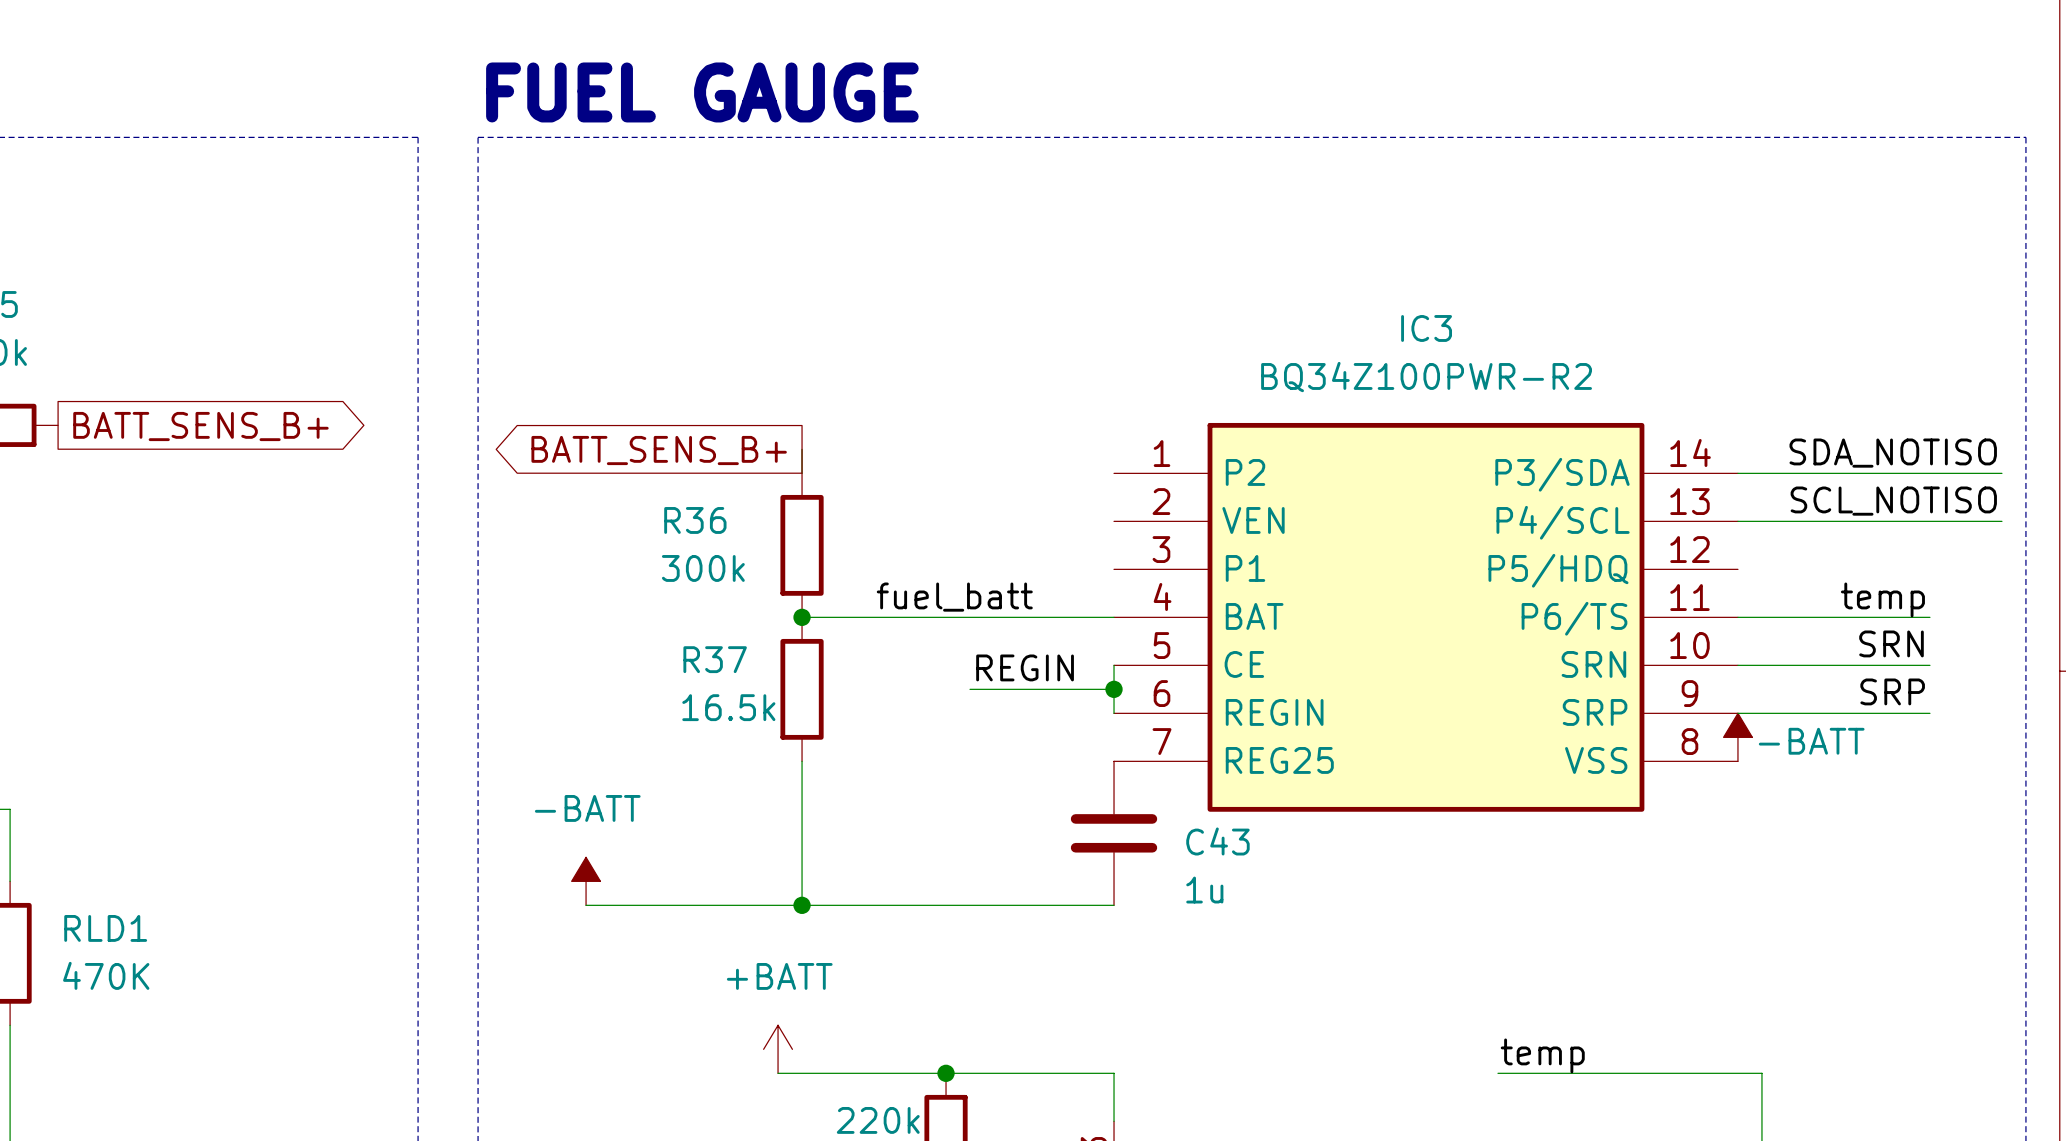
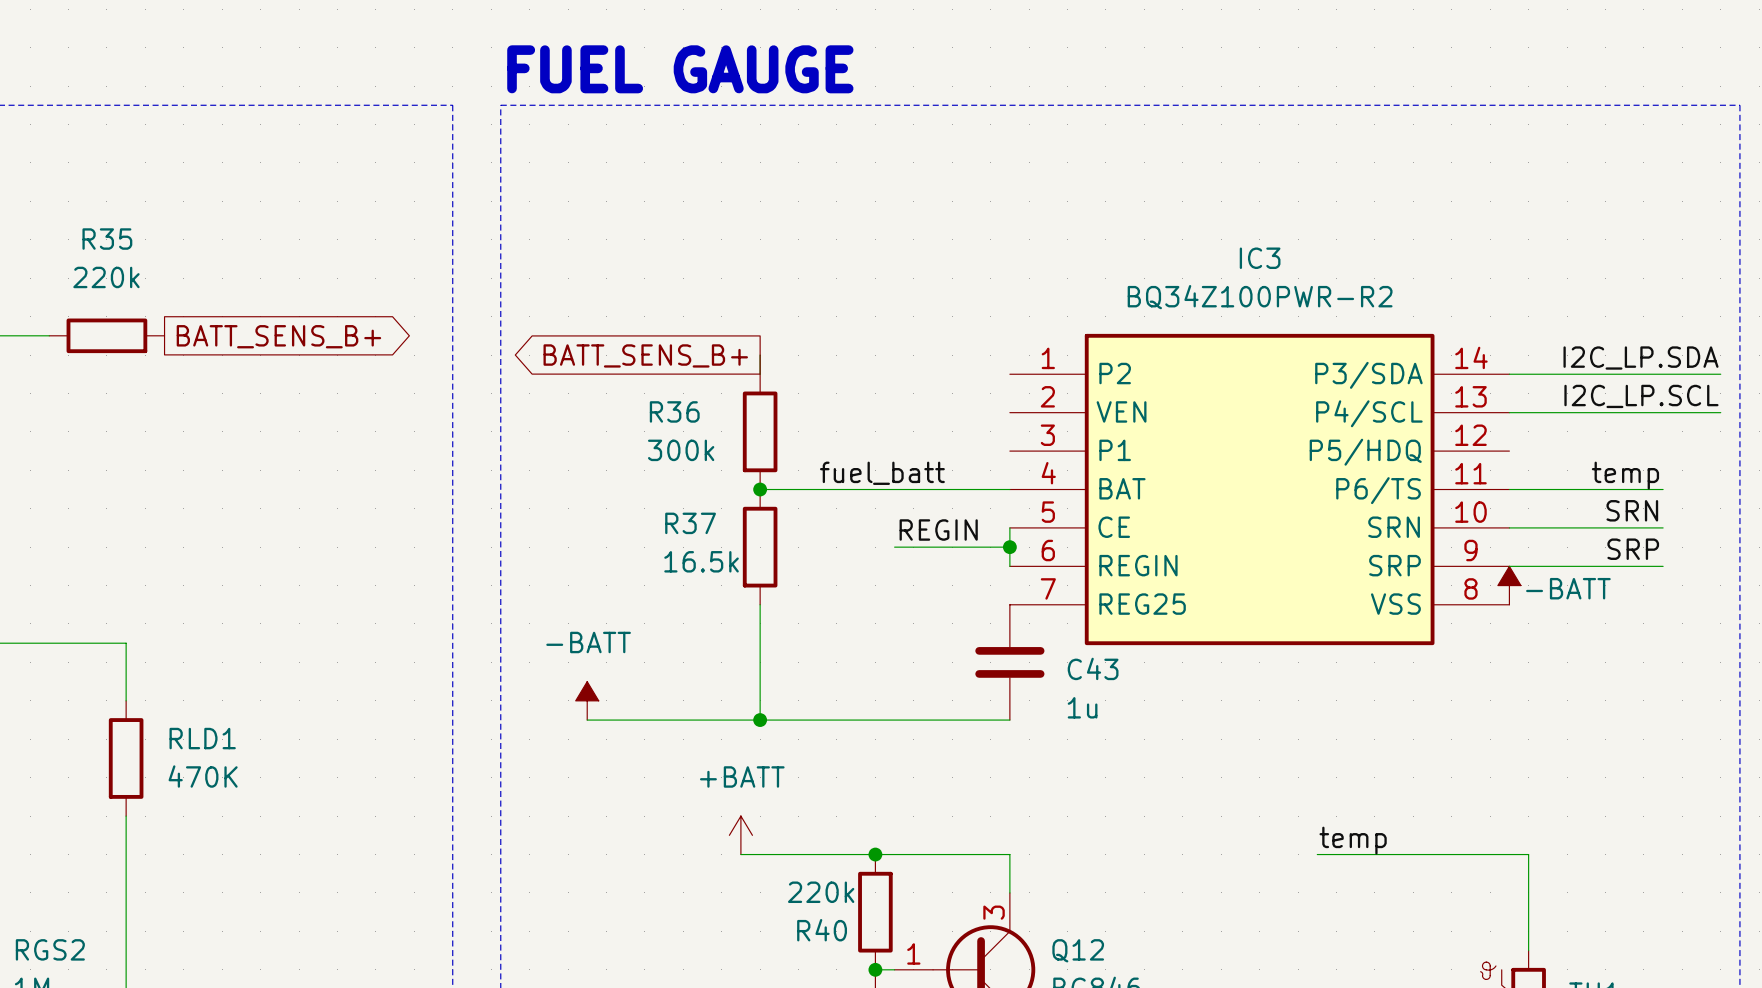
label: SDA_NOTISO (1893, 453) -> I2C_LP.SDA (1641, 358)
label: SCL_NOTISO (1893, 501) -> I2C_LP.SCL (1641, 396)

